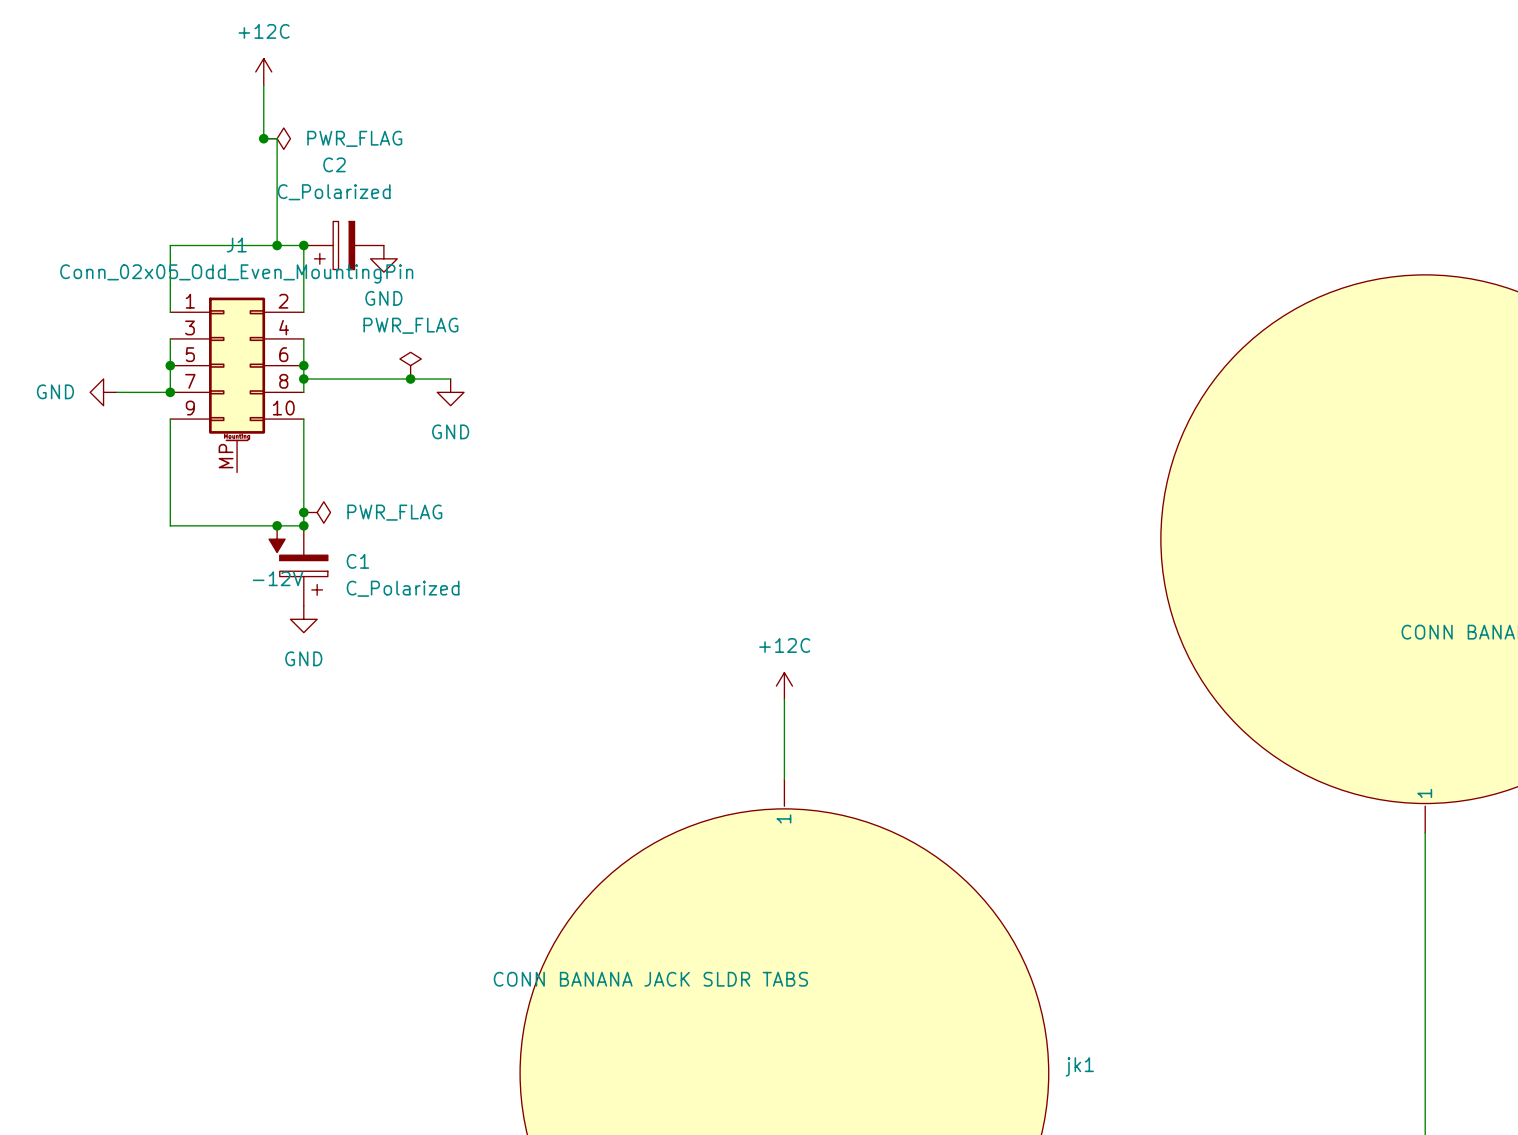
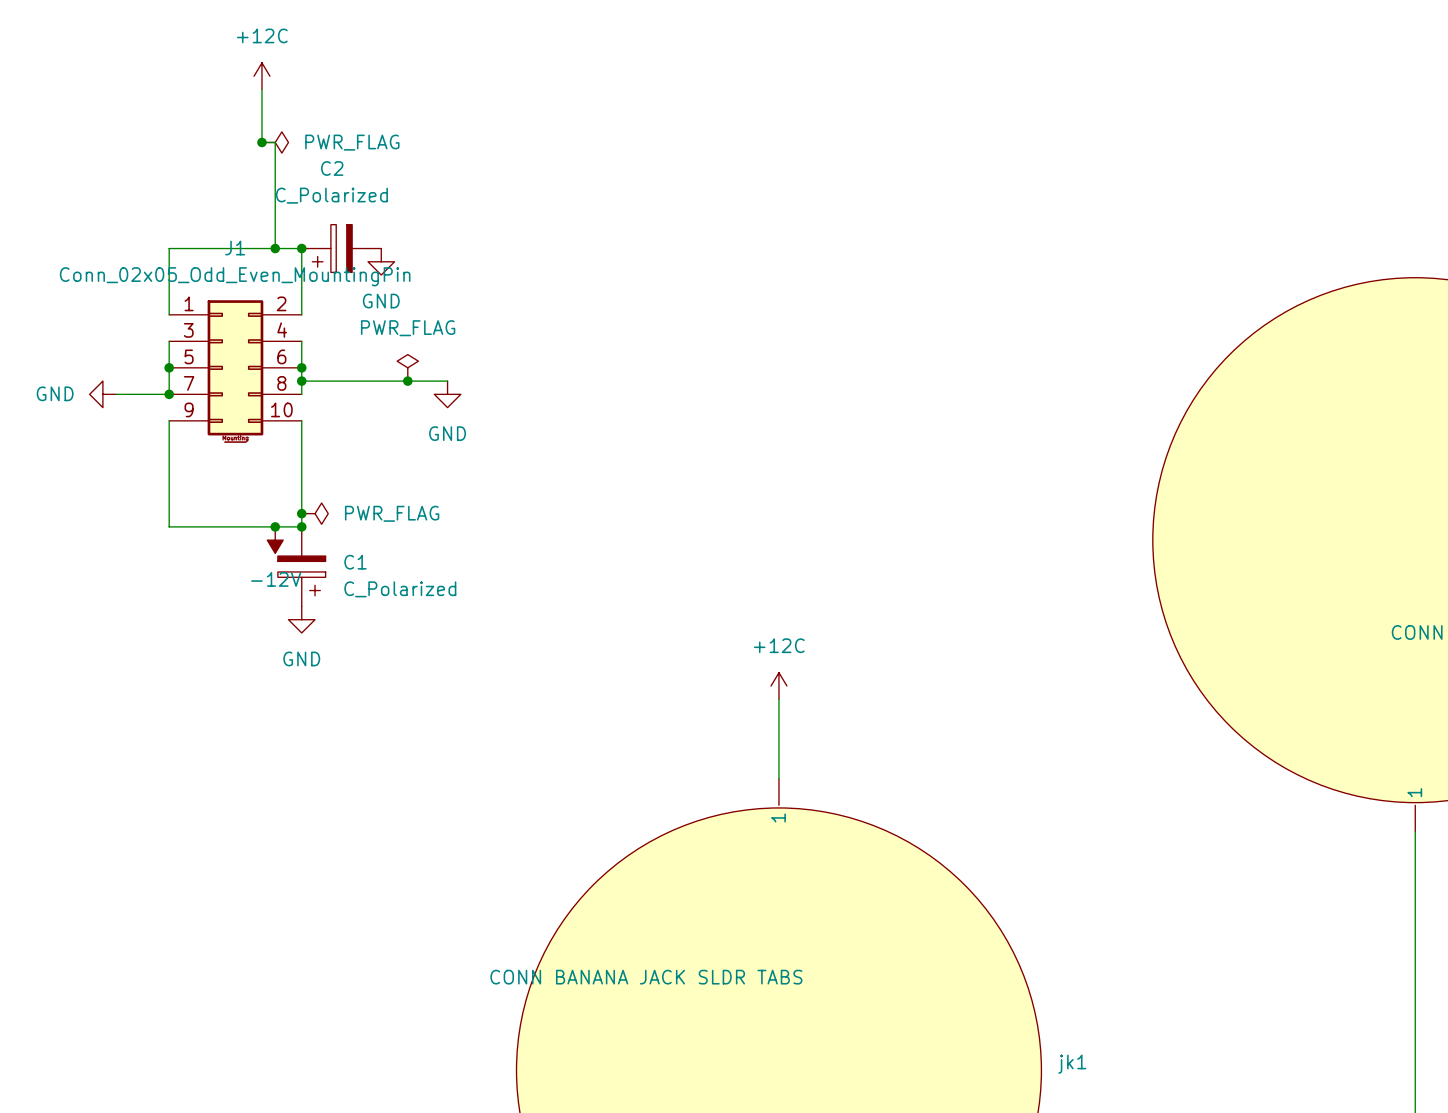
J1 symbol: [170, 297, 304, 473] -> [169, 300, 302, 443]

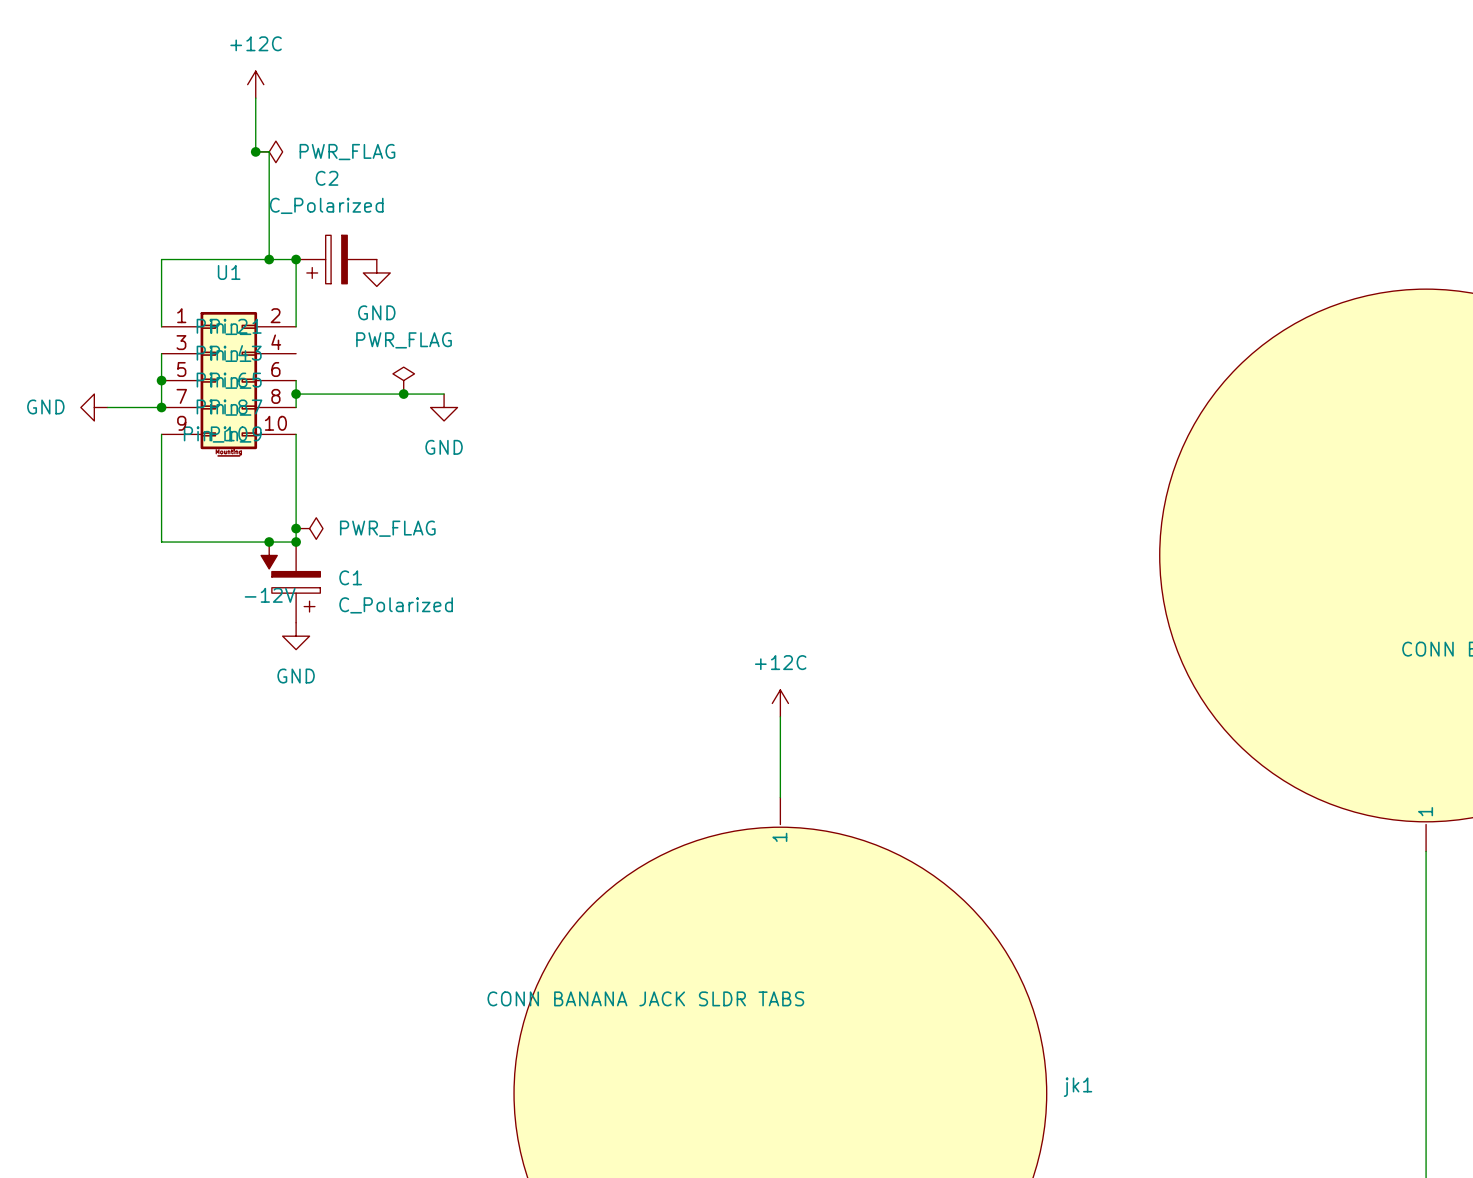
J1 name: J1 (235, 248) -> U1 (229, 272)
J1 value: Conn_02x05_Odd_Even_MountingPin (235, 276) -> none
J1 symbol: [169, 300, 302, 443] -> [161, 311, 297, 457]
wire: (301, 341) (301, 367) -> none
junction: (301, 367) -> none

